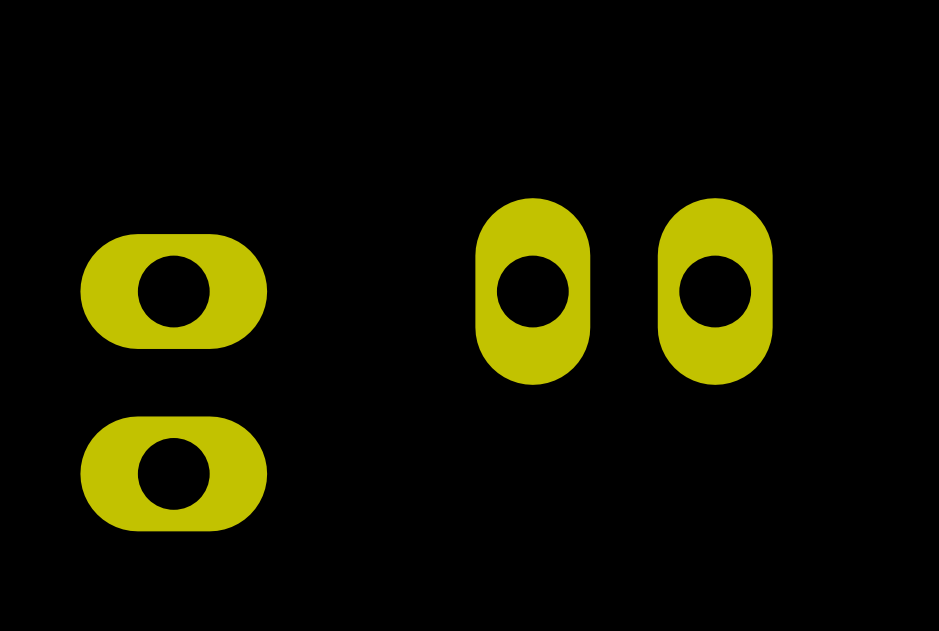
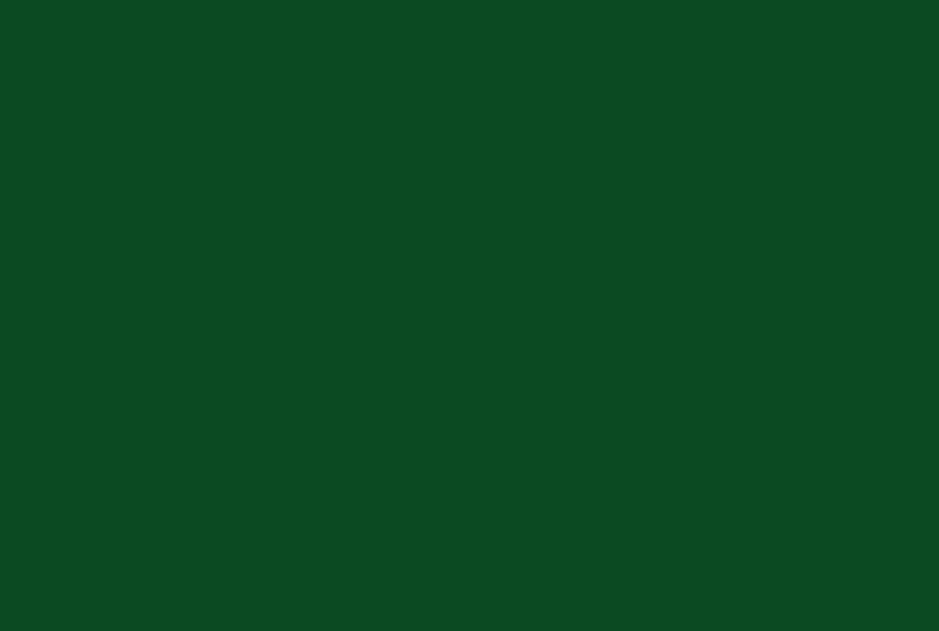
part: (624, 291) -> none
part: (173, 382) -> none

